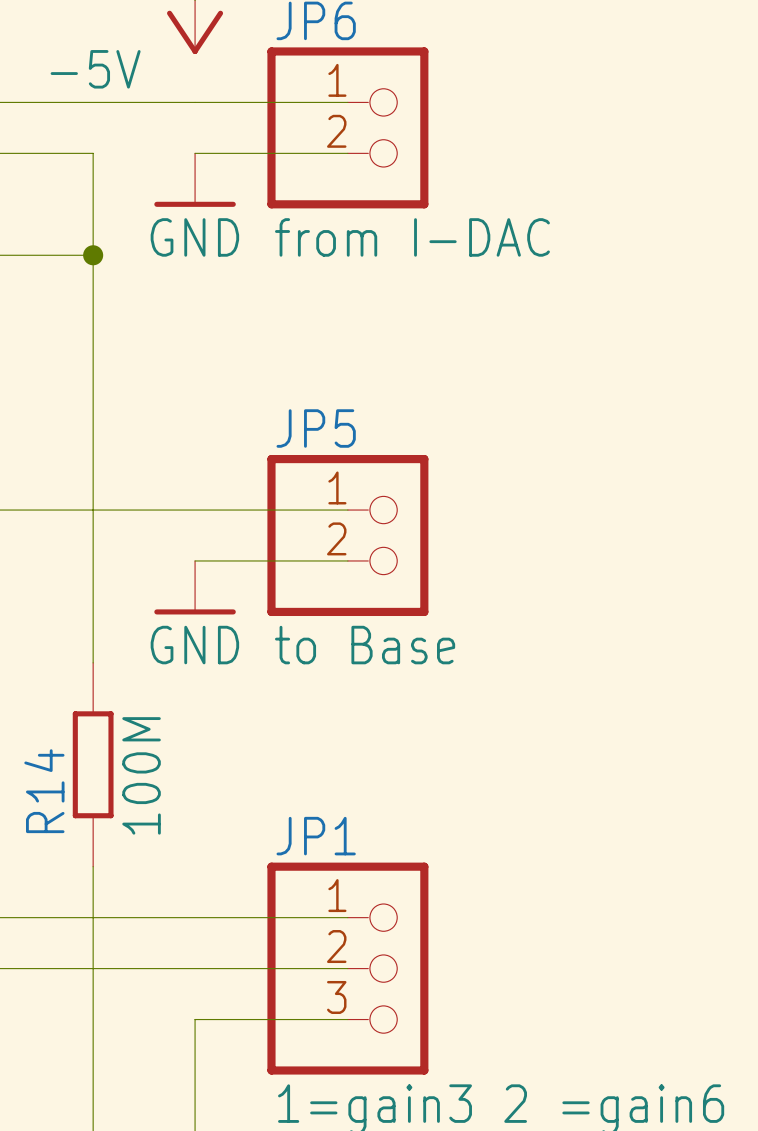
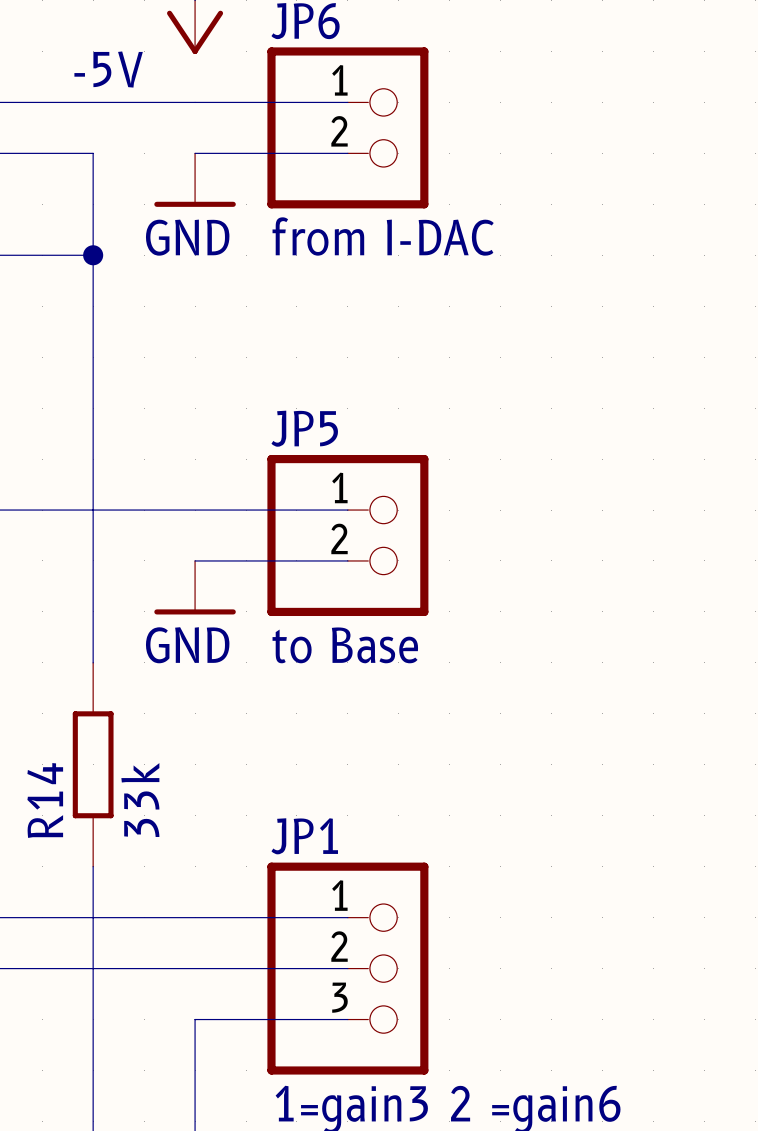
R14 value: 100M (141, 775) -> 33k (140, 800)

